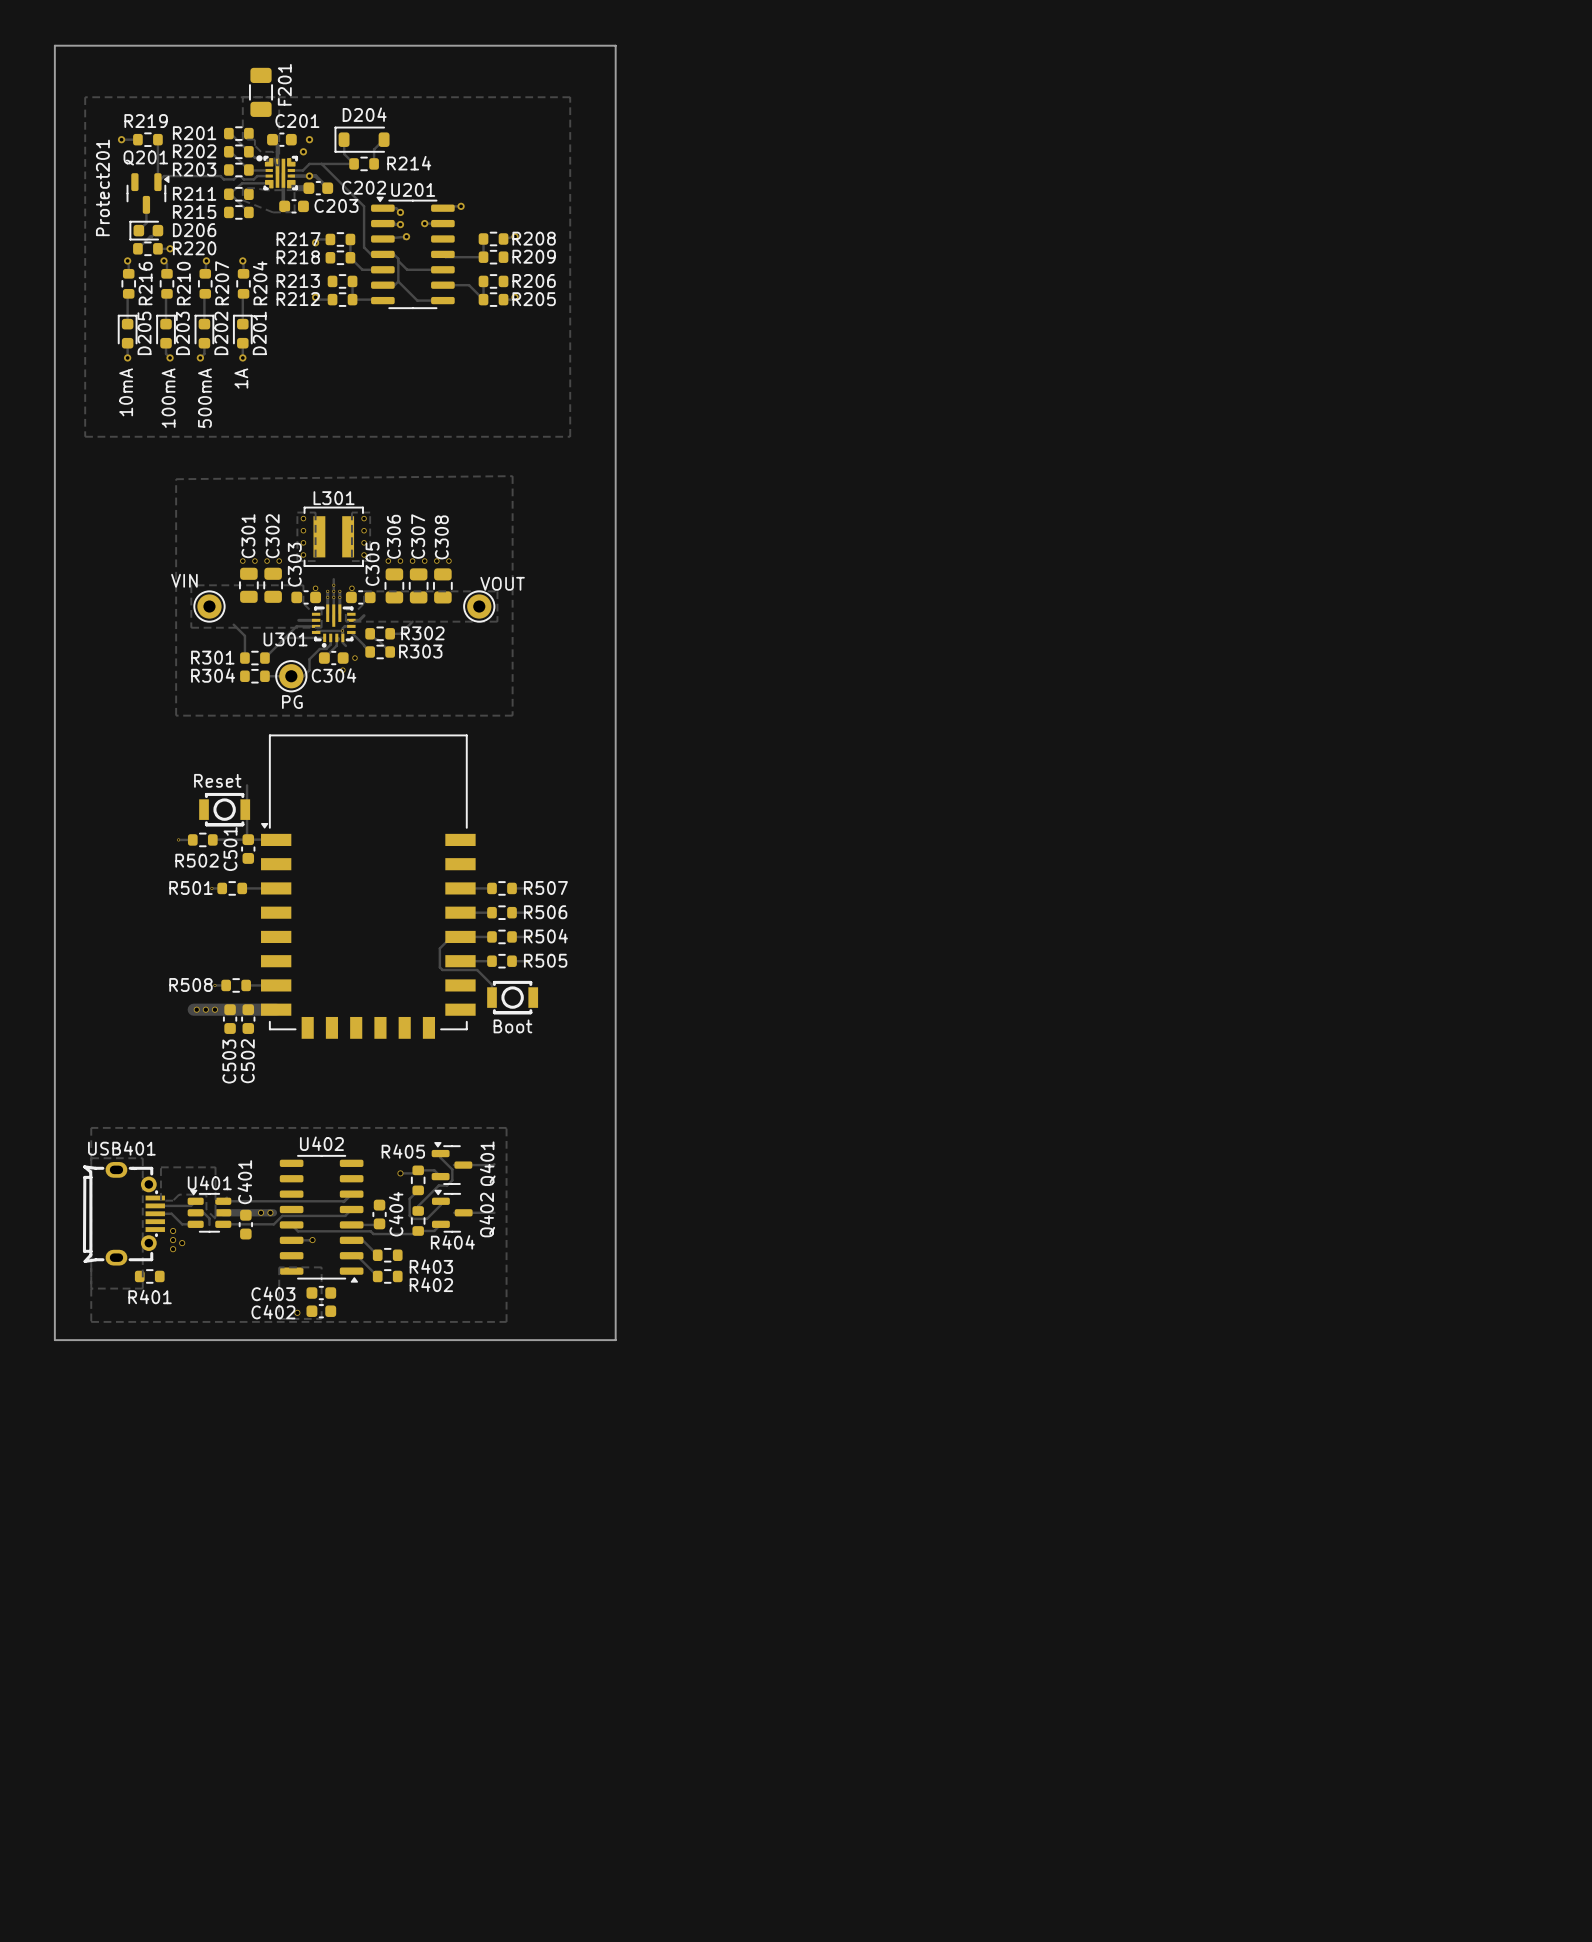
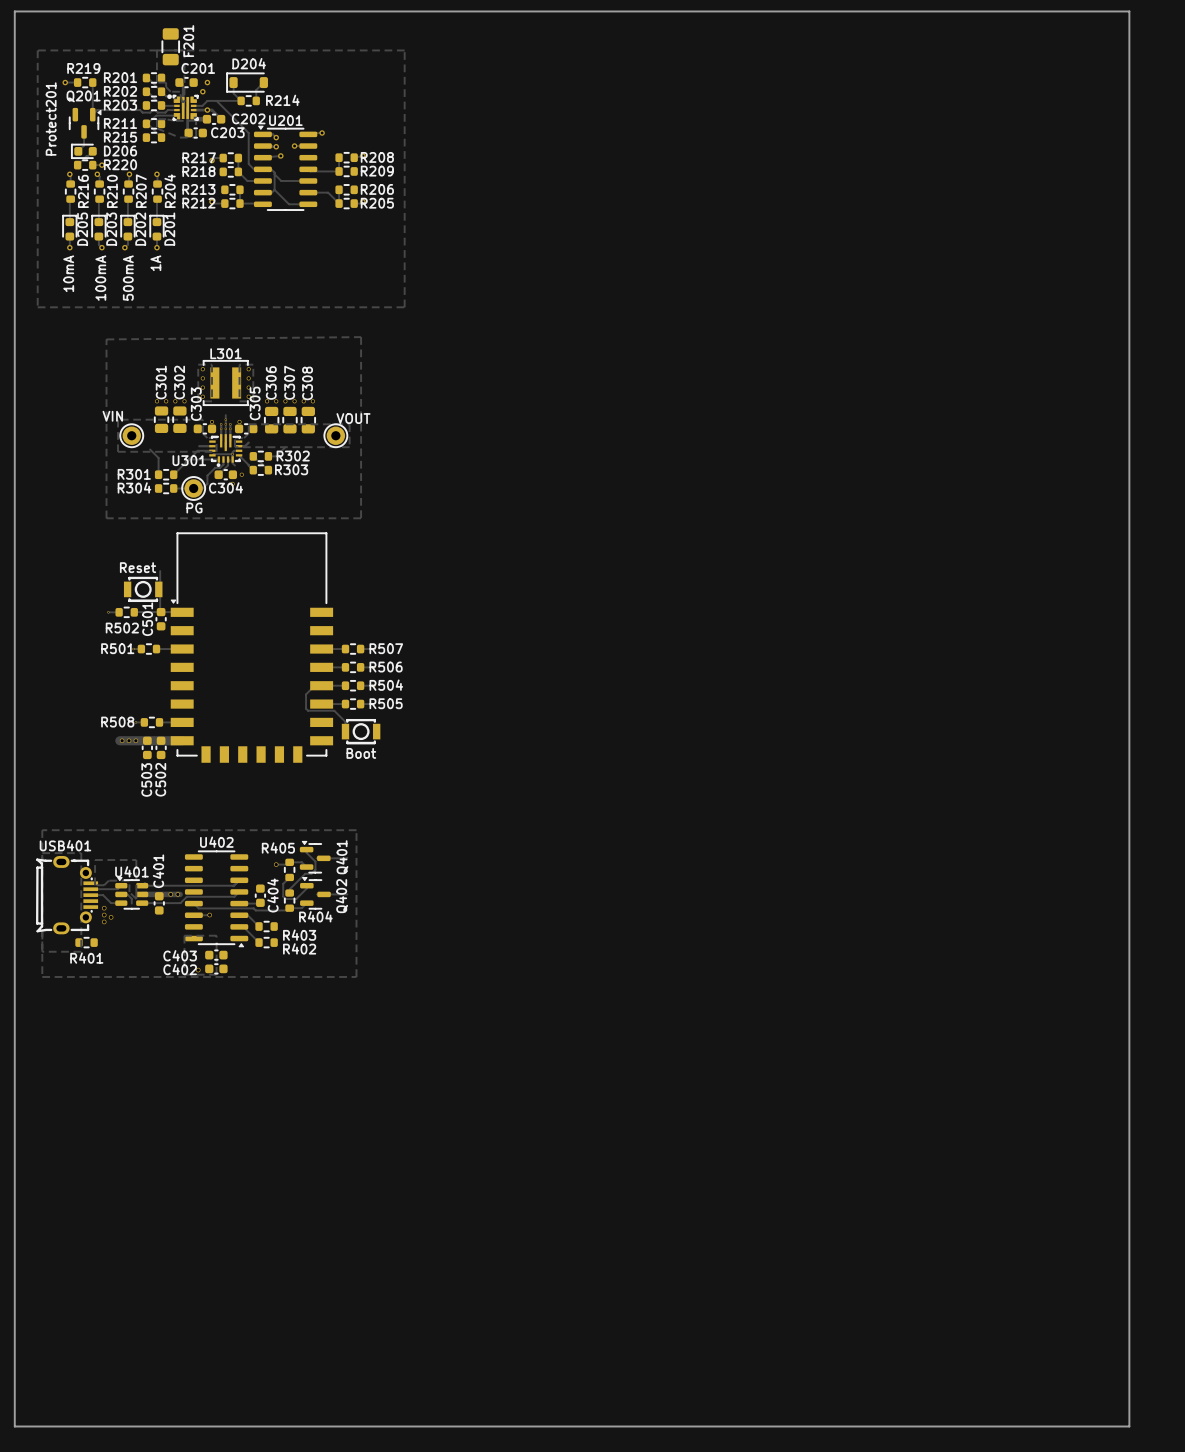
board edge: (615, 45) (615, 1340) (54, 1340) -> (439, 11) (1129, 11) (1129, 1426) (14, 1426) (14, 990)

